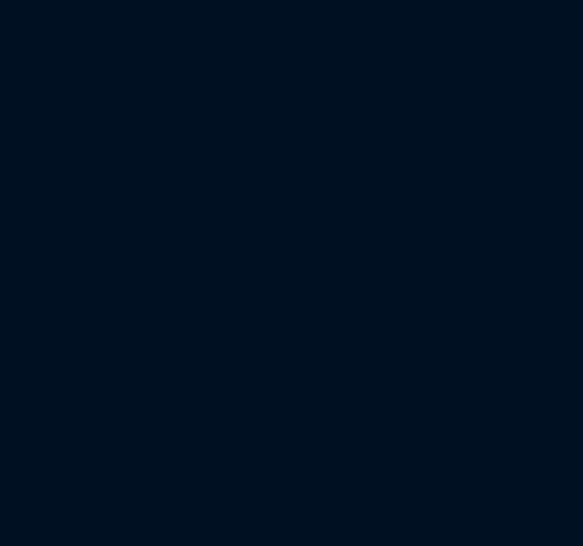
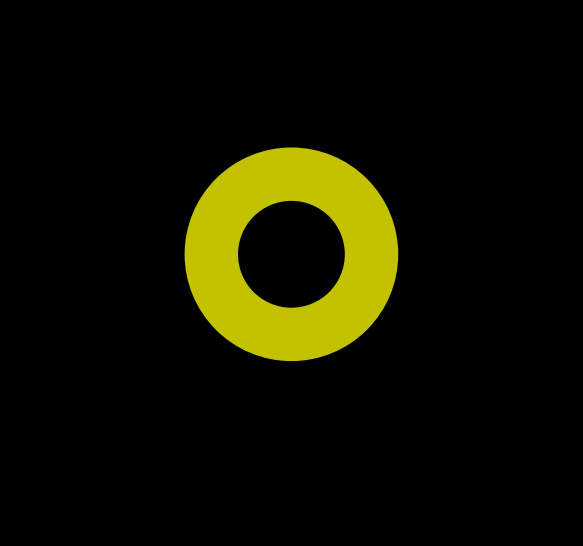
part: none -> (291, 254)

